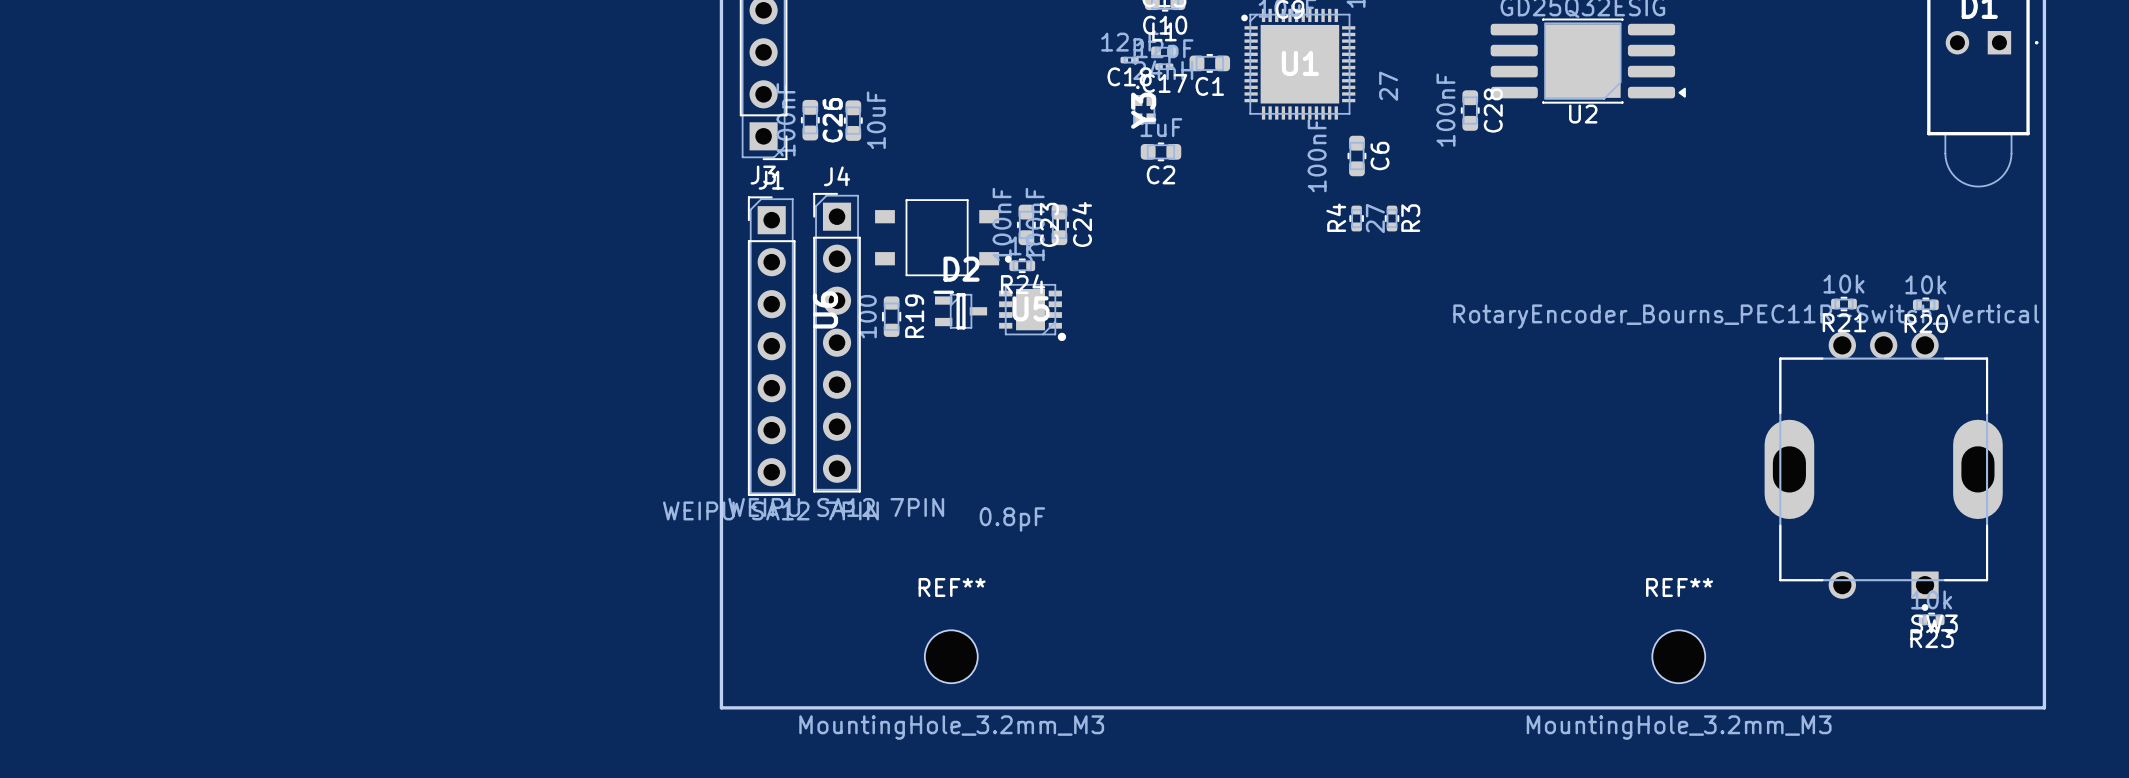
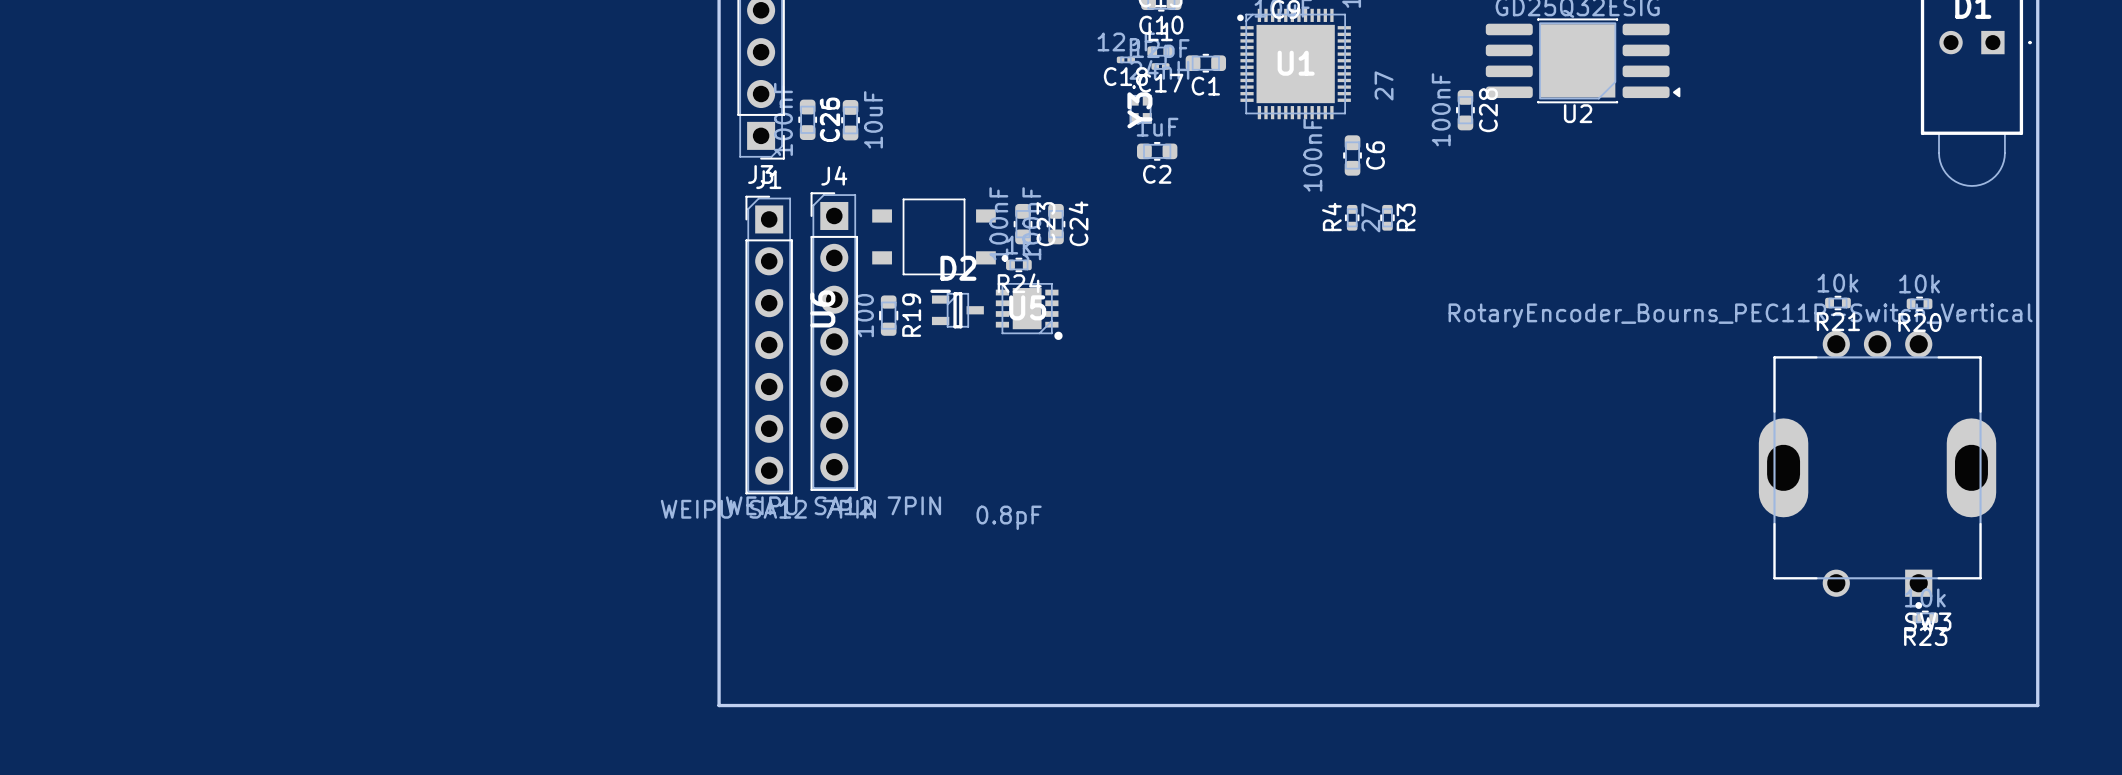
REF**: MountingHole_3.2mm_M3 (951, 656) -> none
REF**: MountingHole_3.2mm_M3 (1678, 656) -> none

